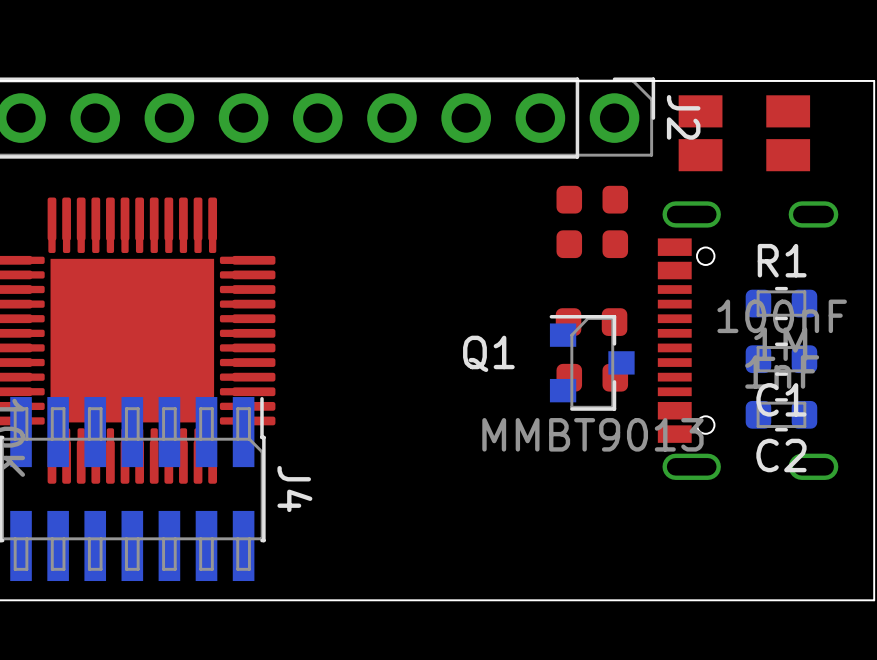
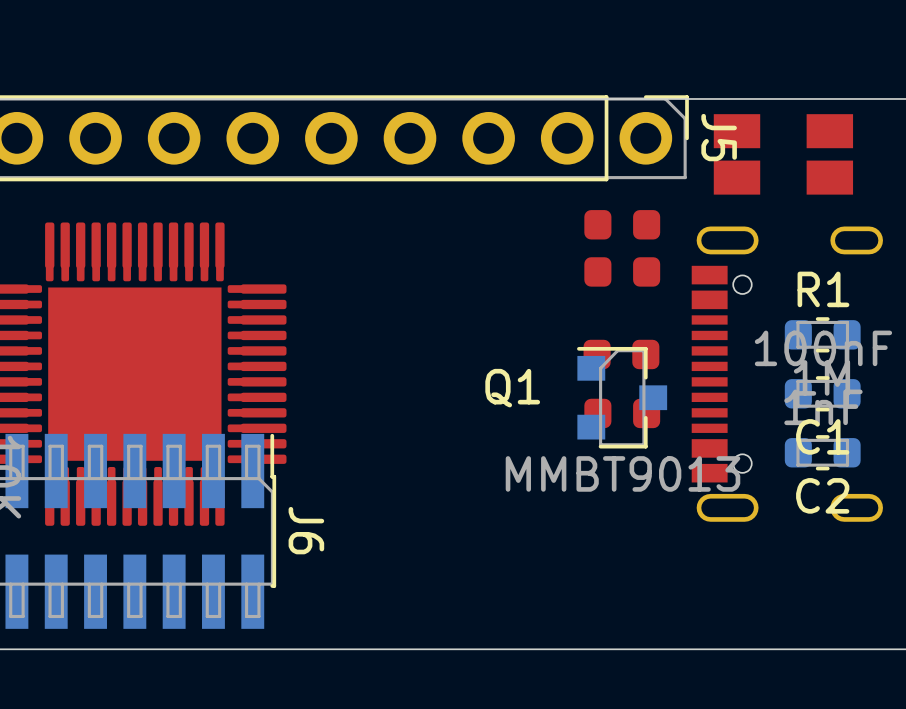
J2 name: J2 (683, 117) -> J5 (719, 137)
J4 name: J4 (294, 489) -> J6 (306, 530)

